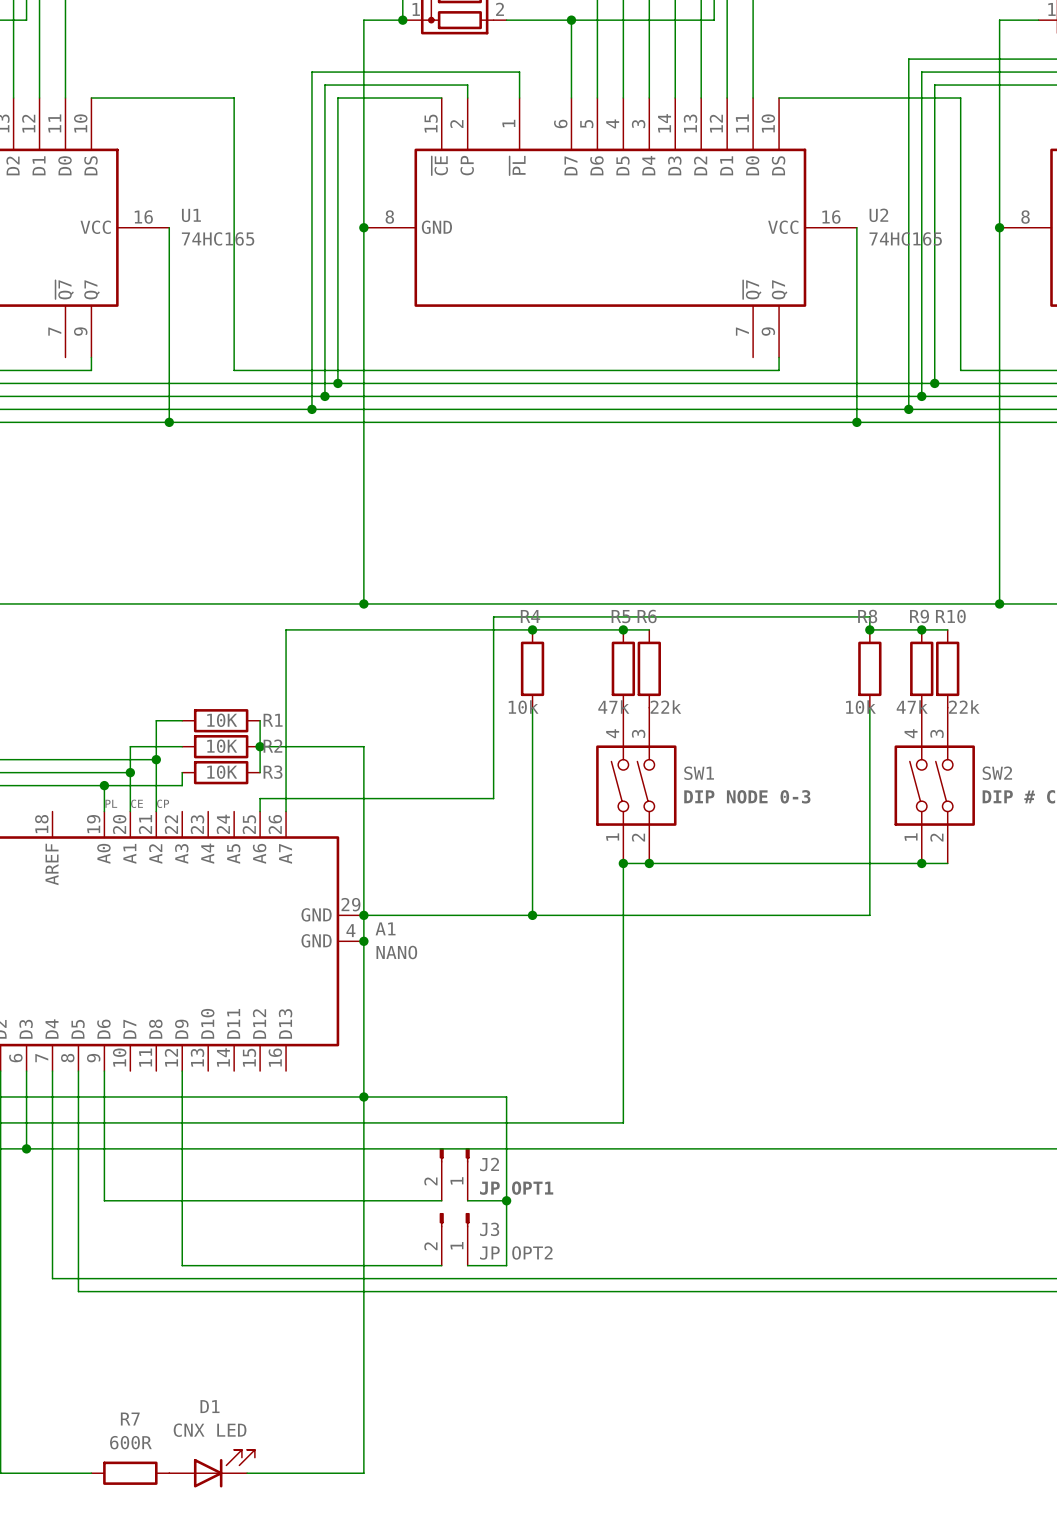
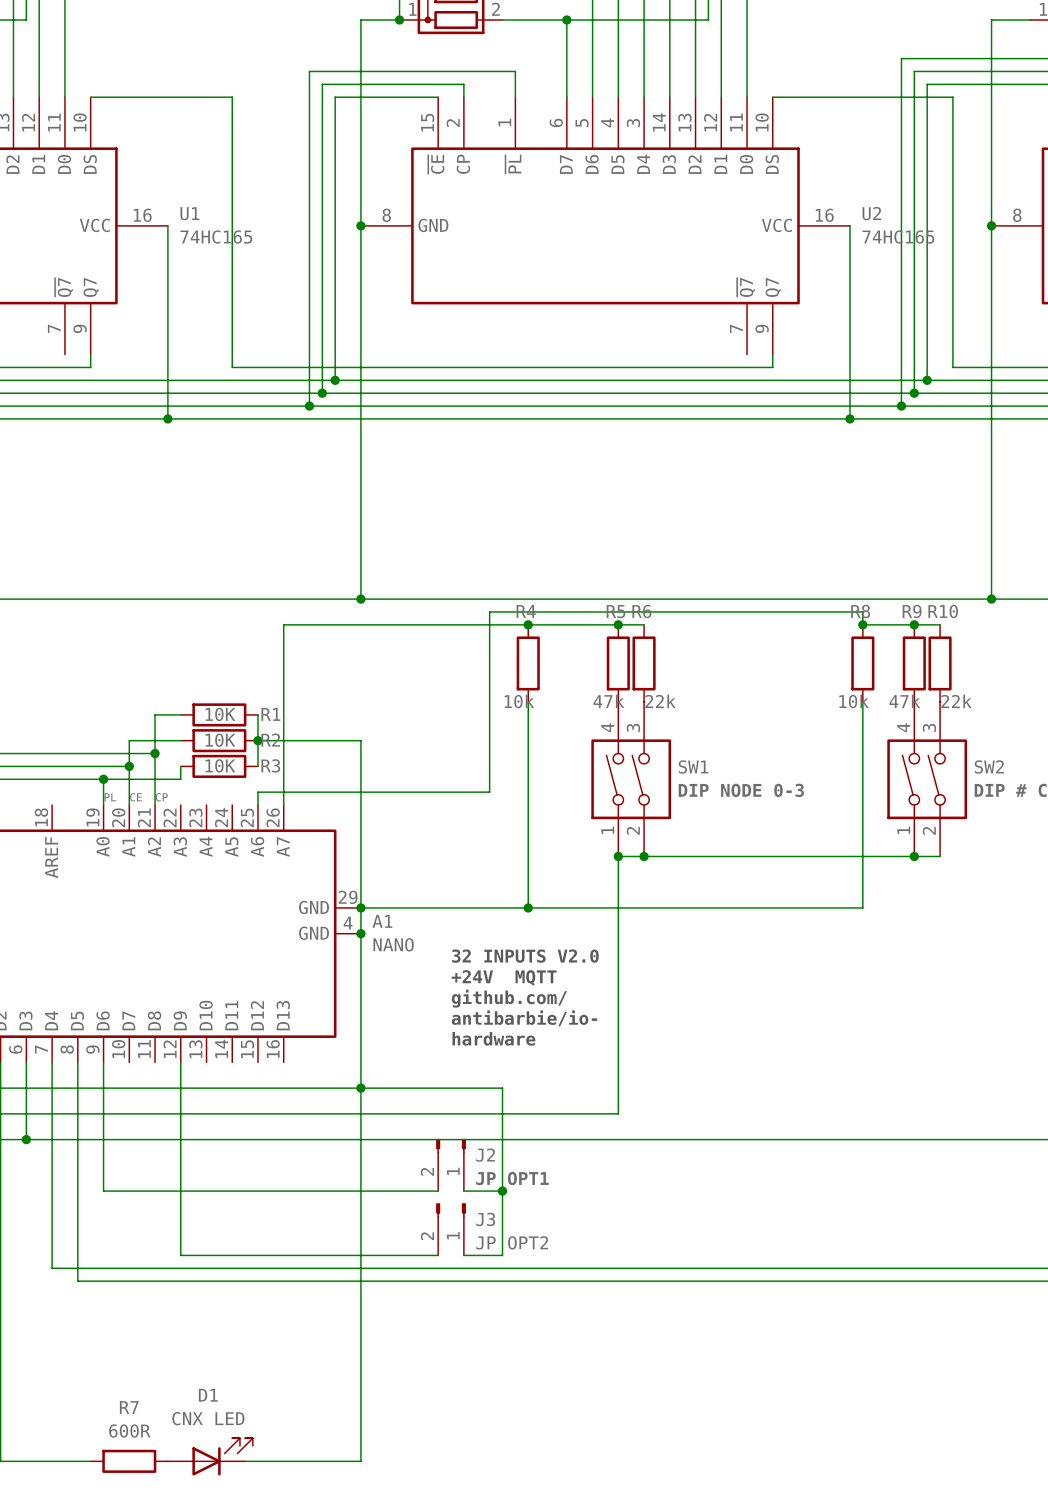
text: none -> 32 INPUTS V2.0 (525, 956)
text: none -> +24V MQTT (504, 977)
text: none -> github.com/ (509, 998)
text: none -> antibarbie/io- (524, 1018)
text: none -> hardware (493, 1038)

